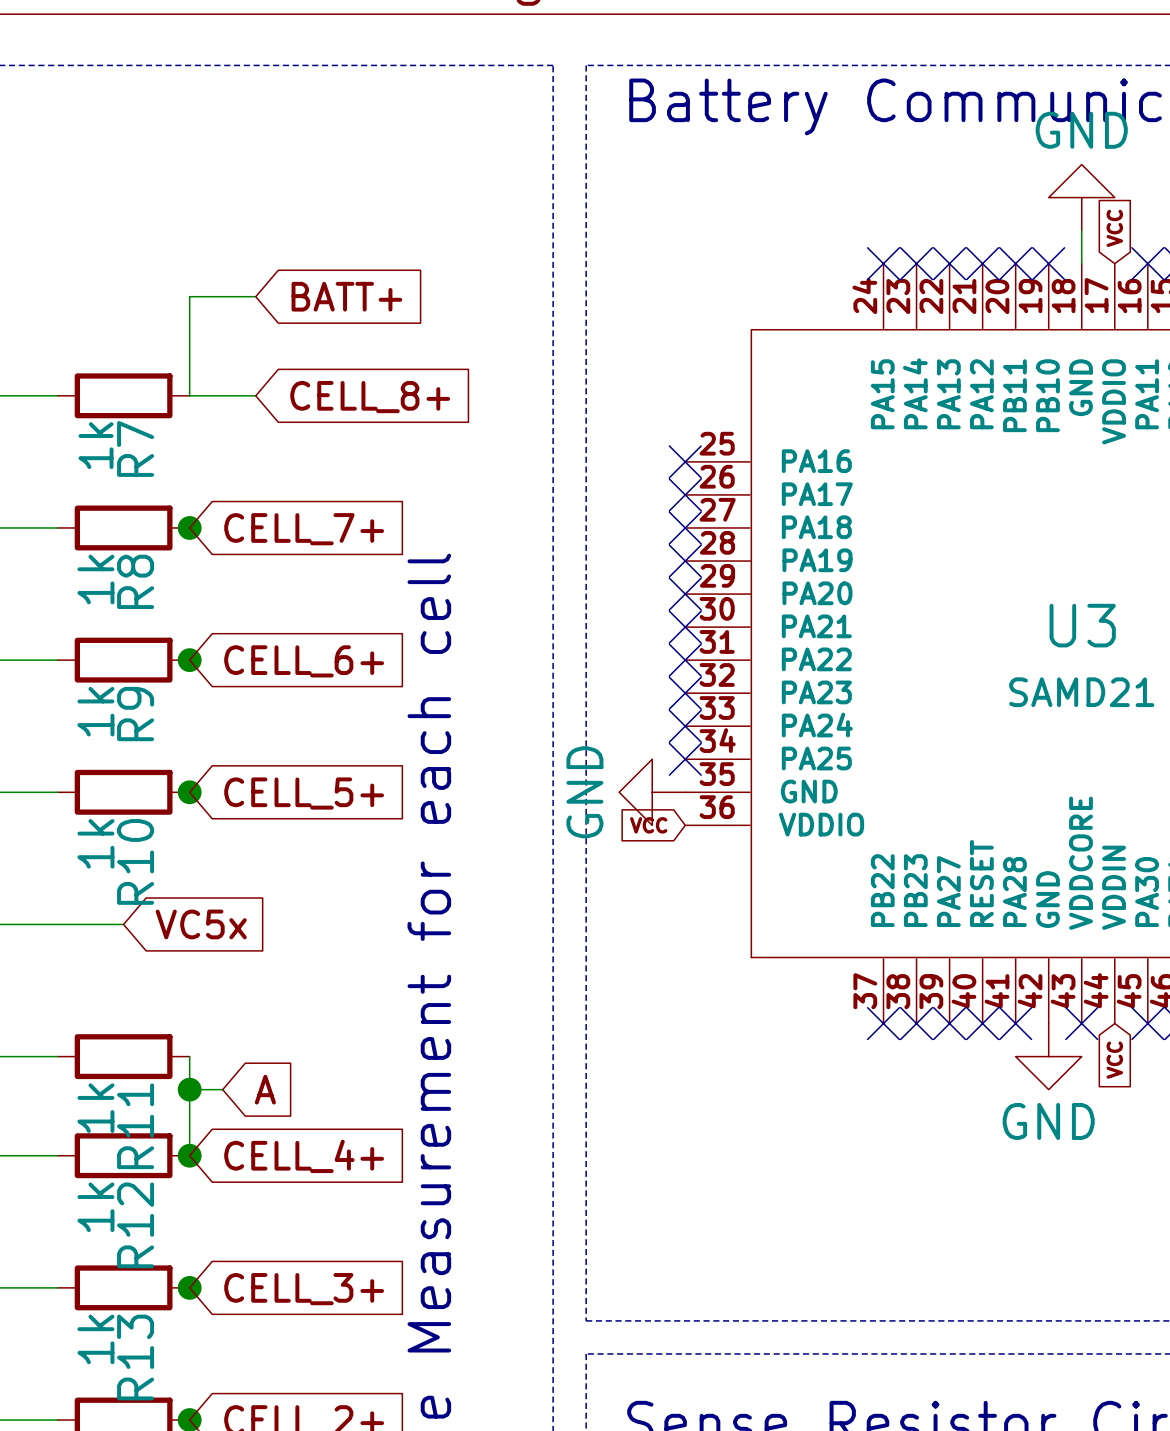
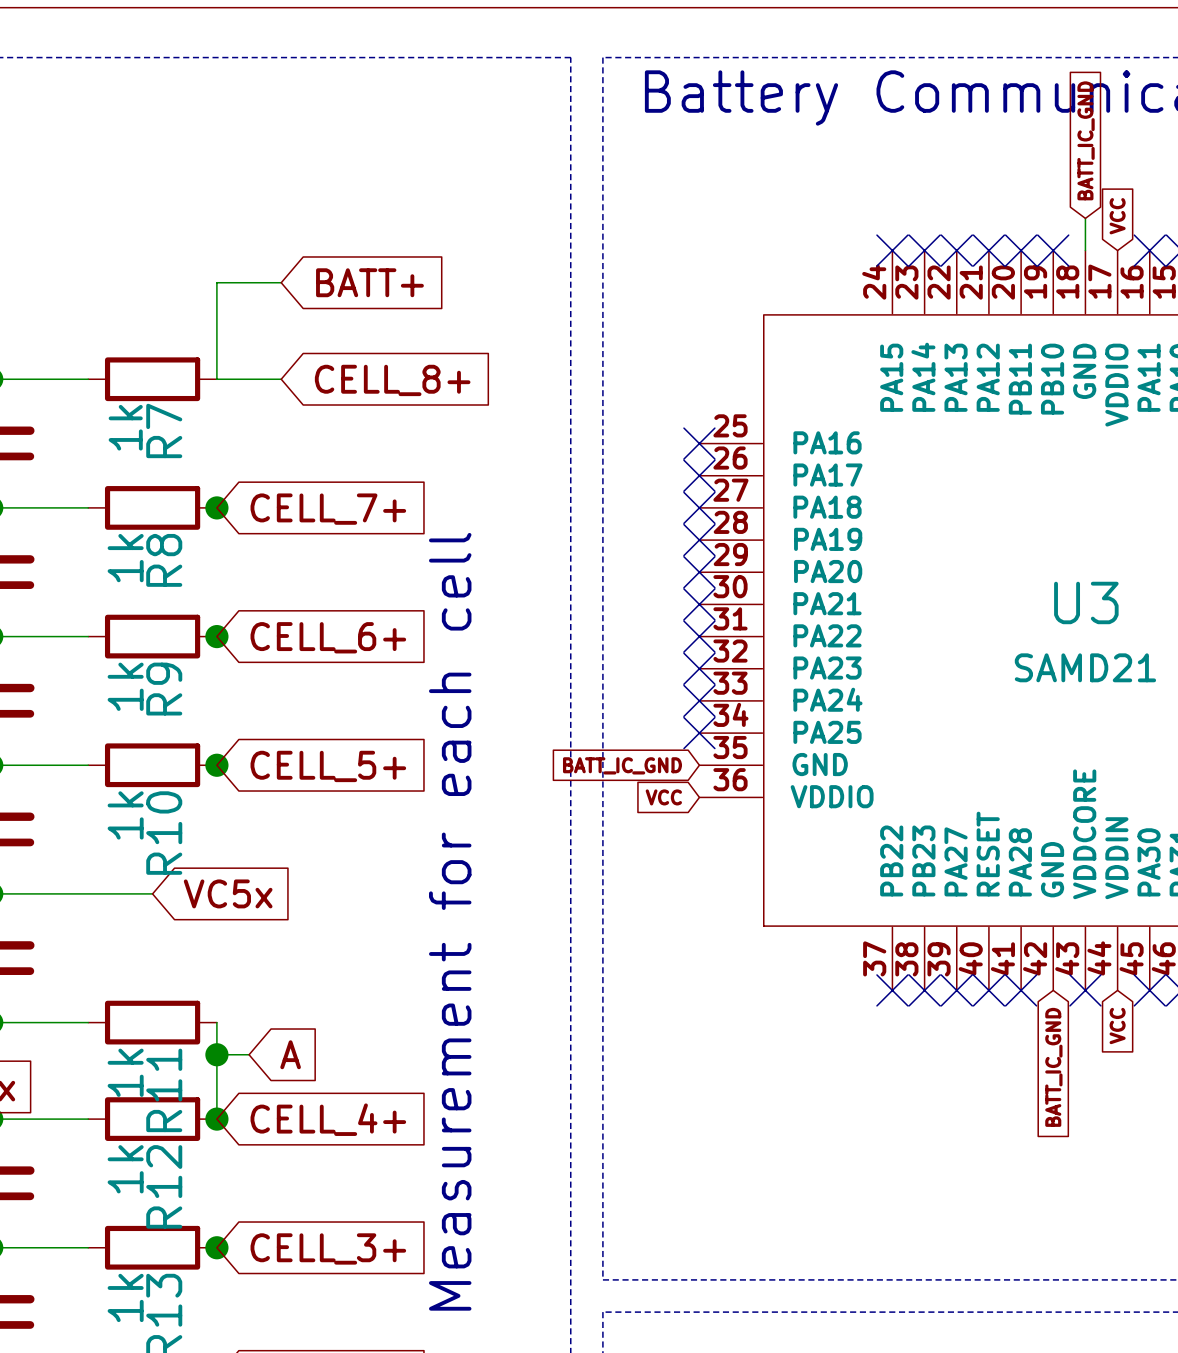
global label: none -> BATT_IC_GND (1086, 140)
power symbol: GND (1081, 197) -> none
global label: none -> BATT_IC_GND (622, 765)
power symbol: GND (652, 792) -> none
power symbol: GND (1048, 1056) -> none
global label: none -> BATT_IC_GND (1053, 1067)

